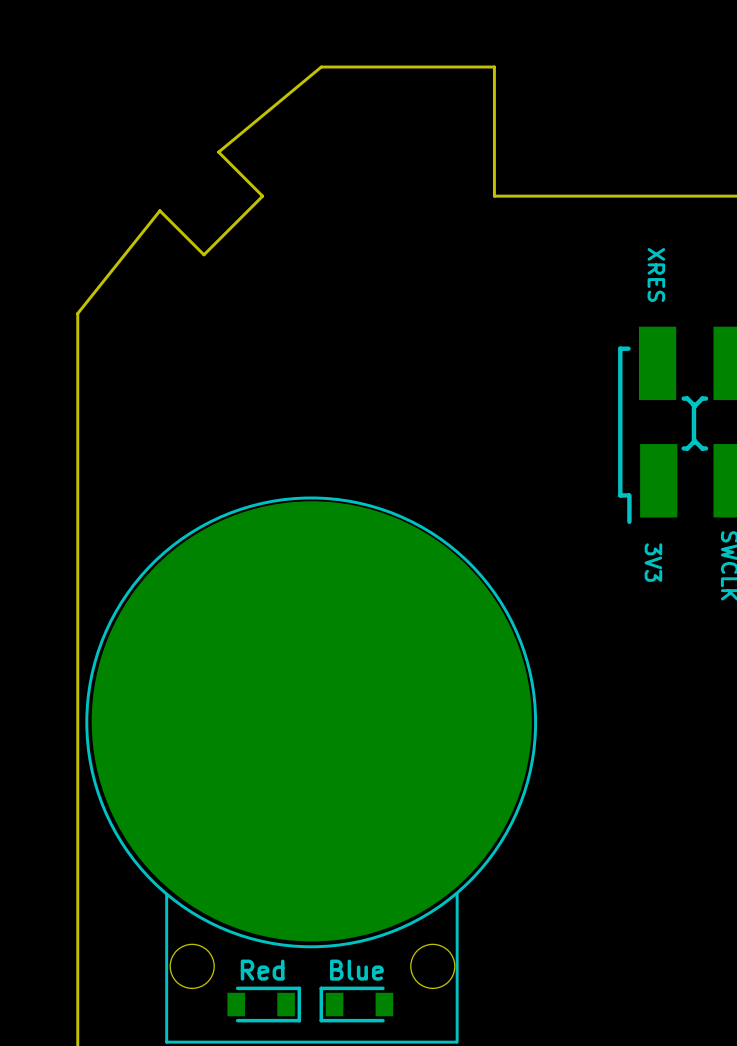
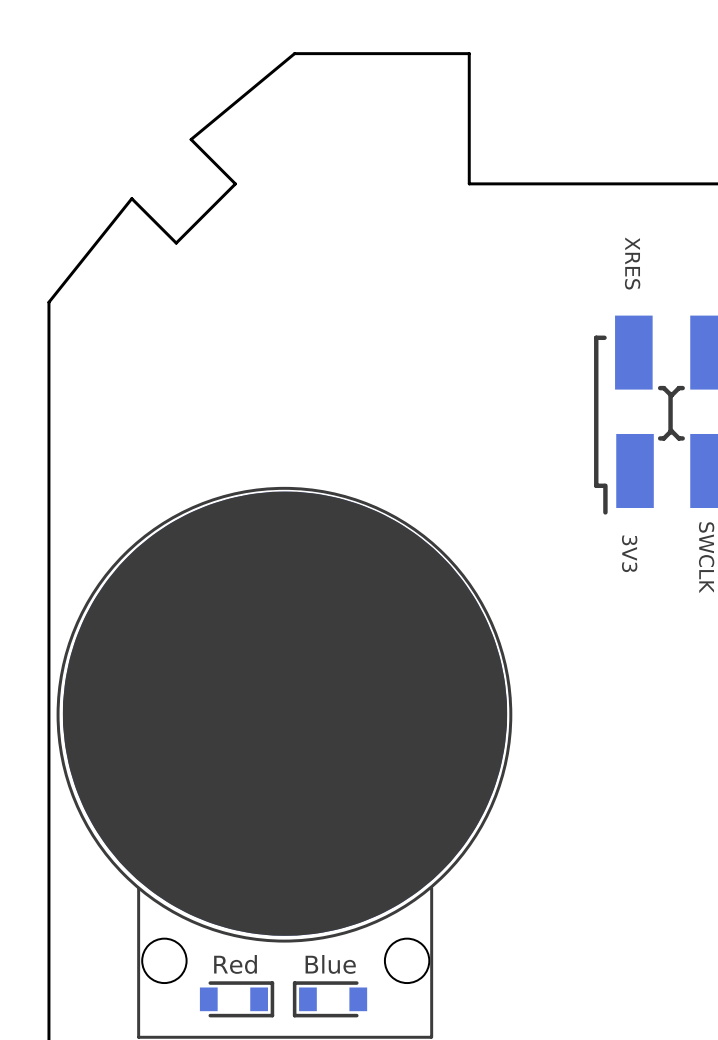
part footprint: [91, 501, 532, 942] -> [62, 491, 508, 936]

